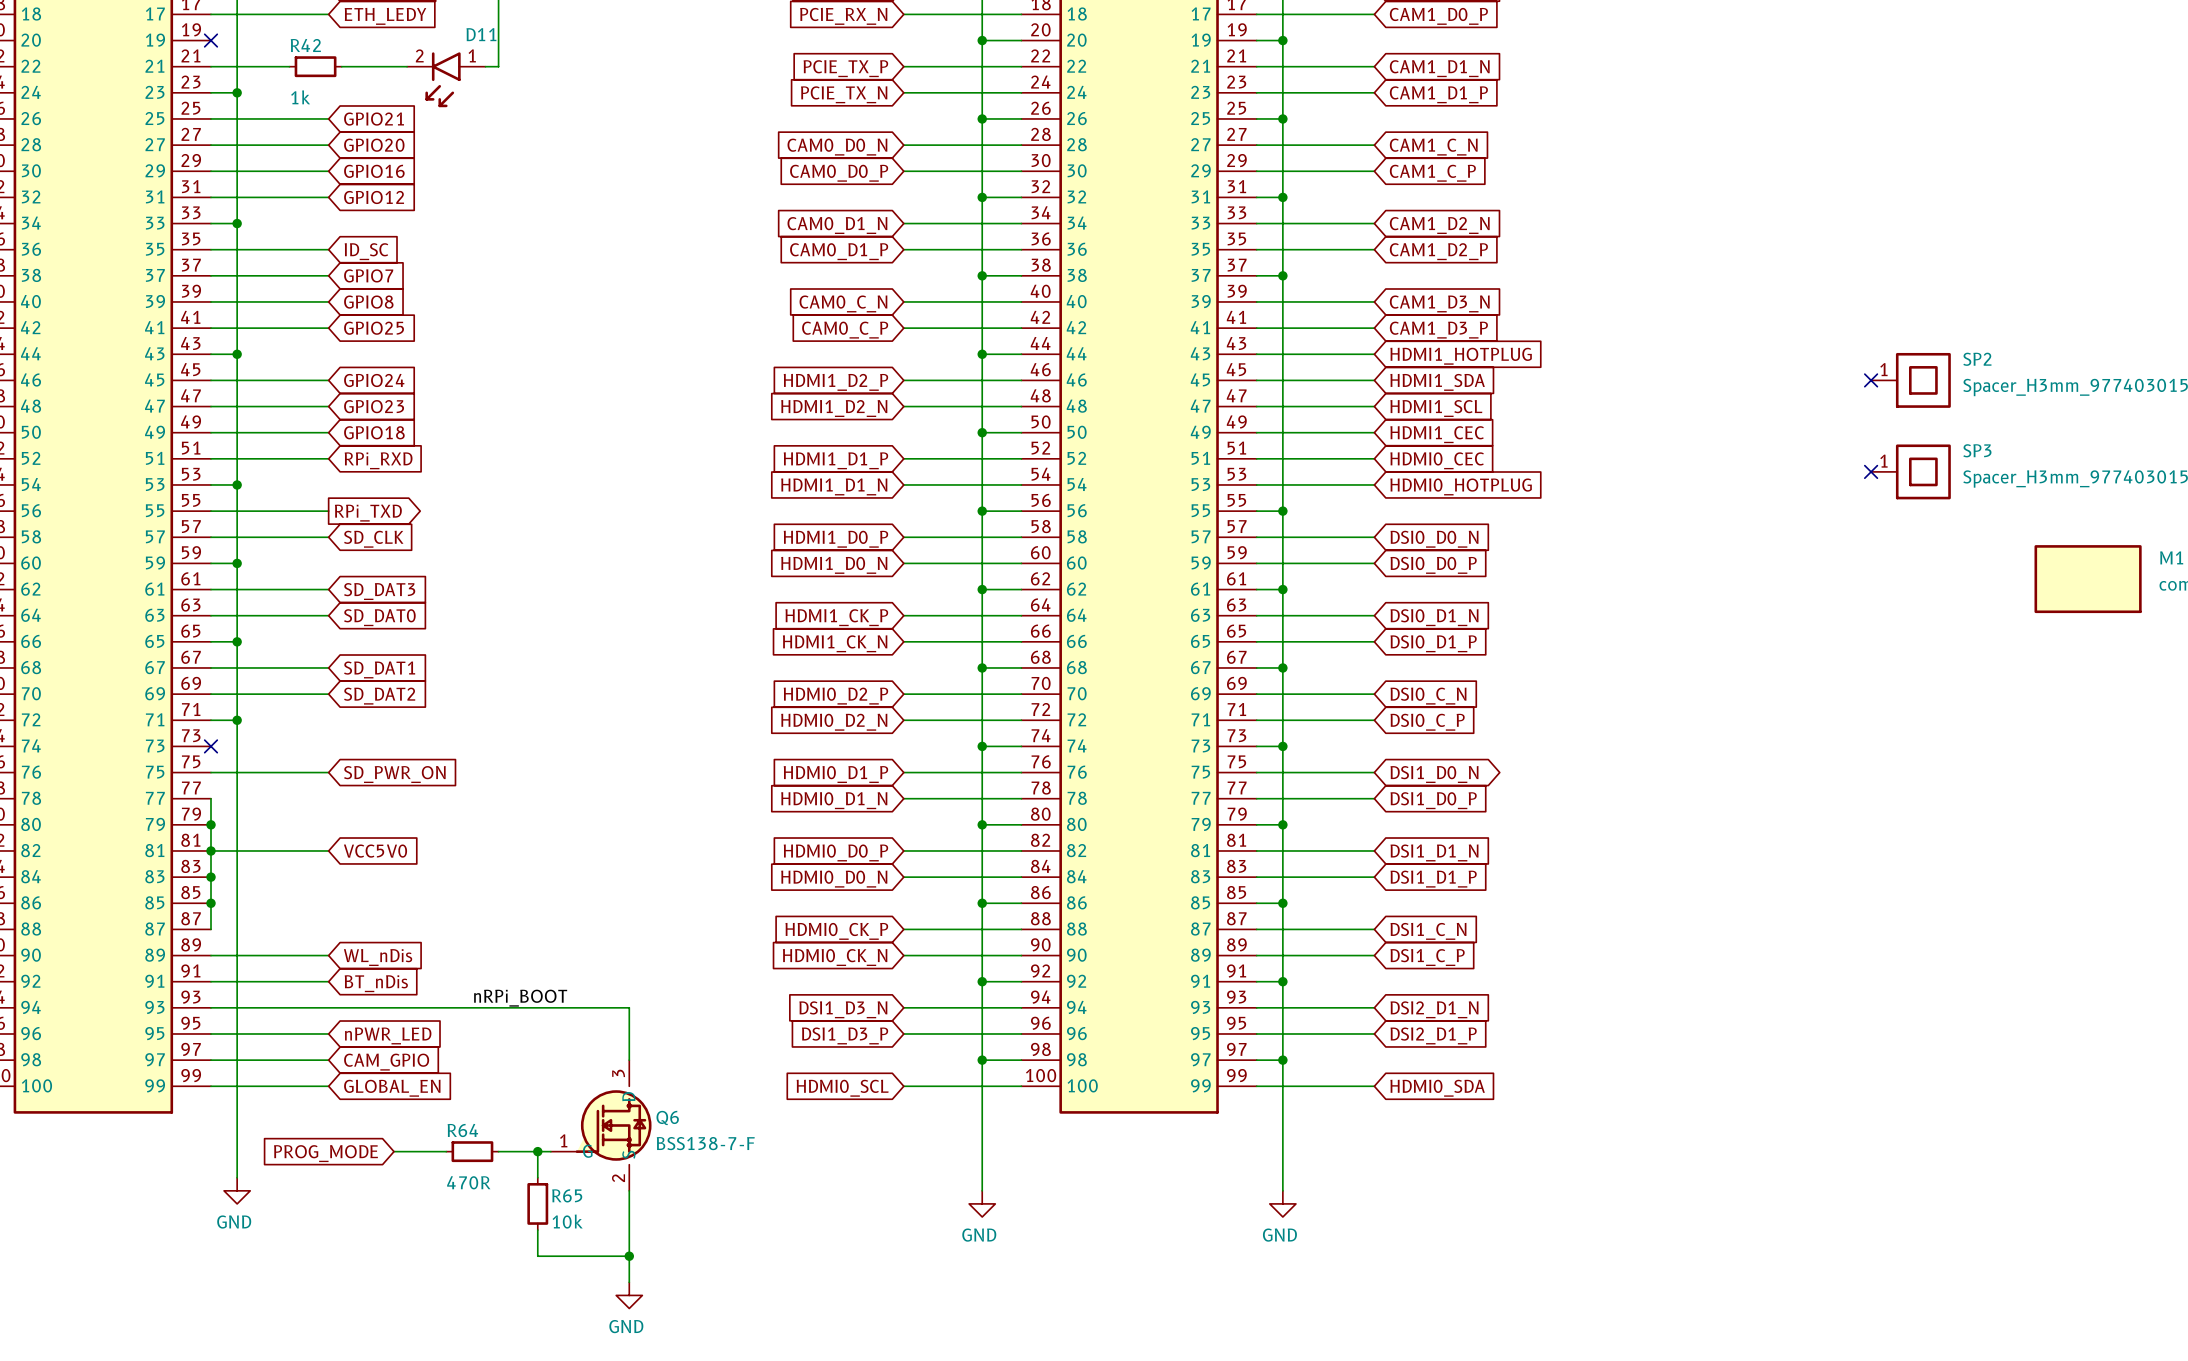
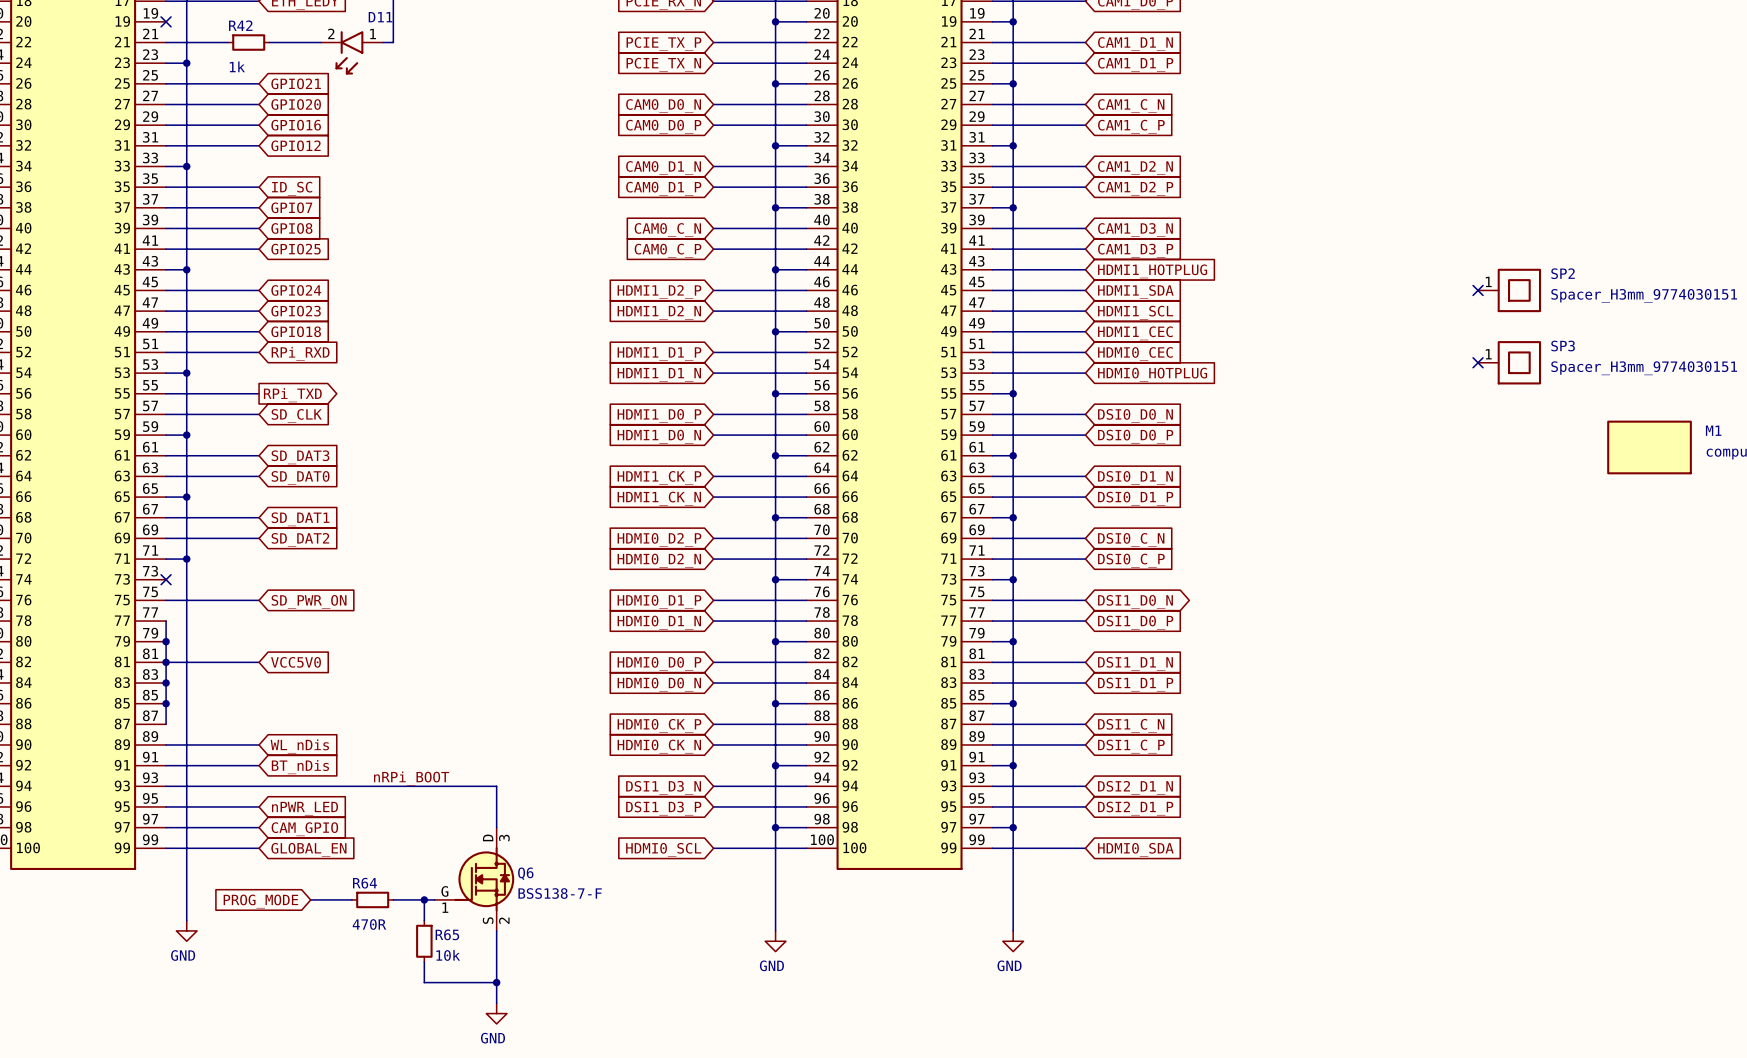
Q6 symbol: [550, 1060, 652, 1191] -> [434, 827, 515, 931]

